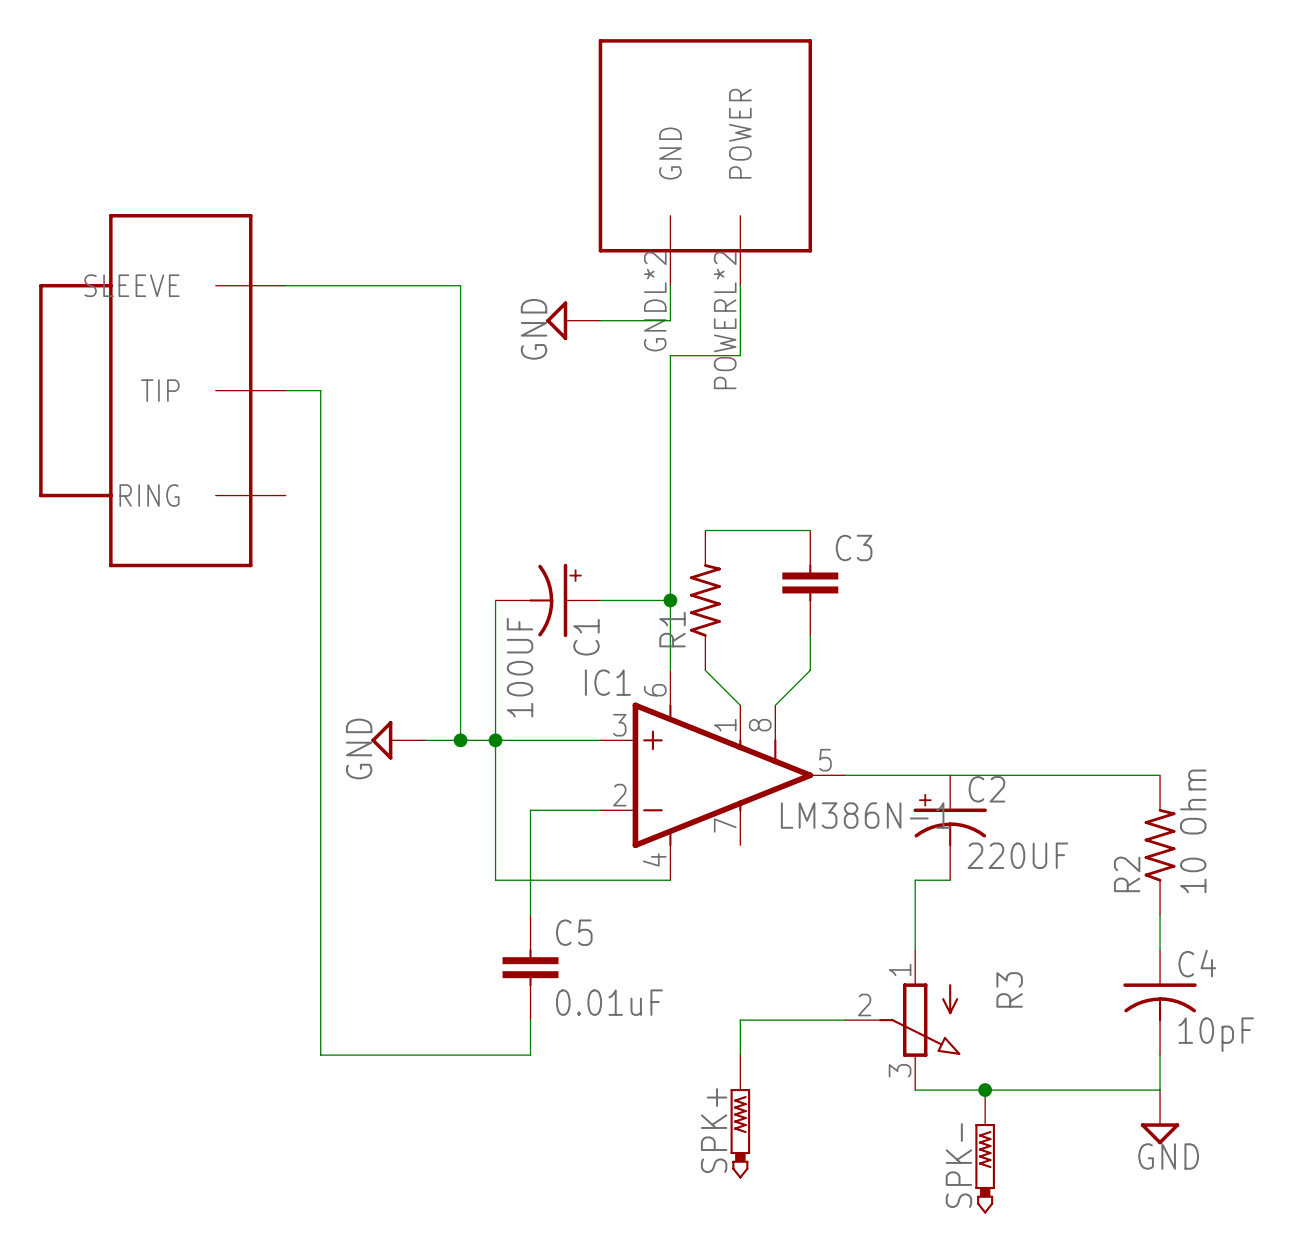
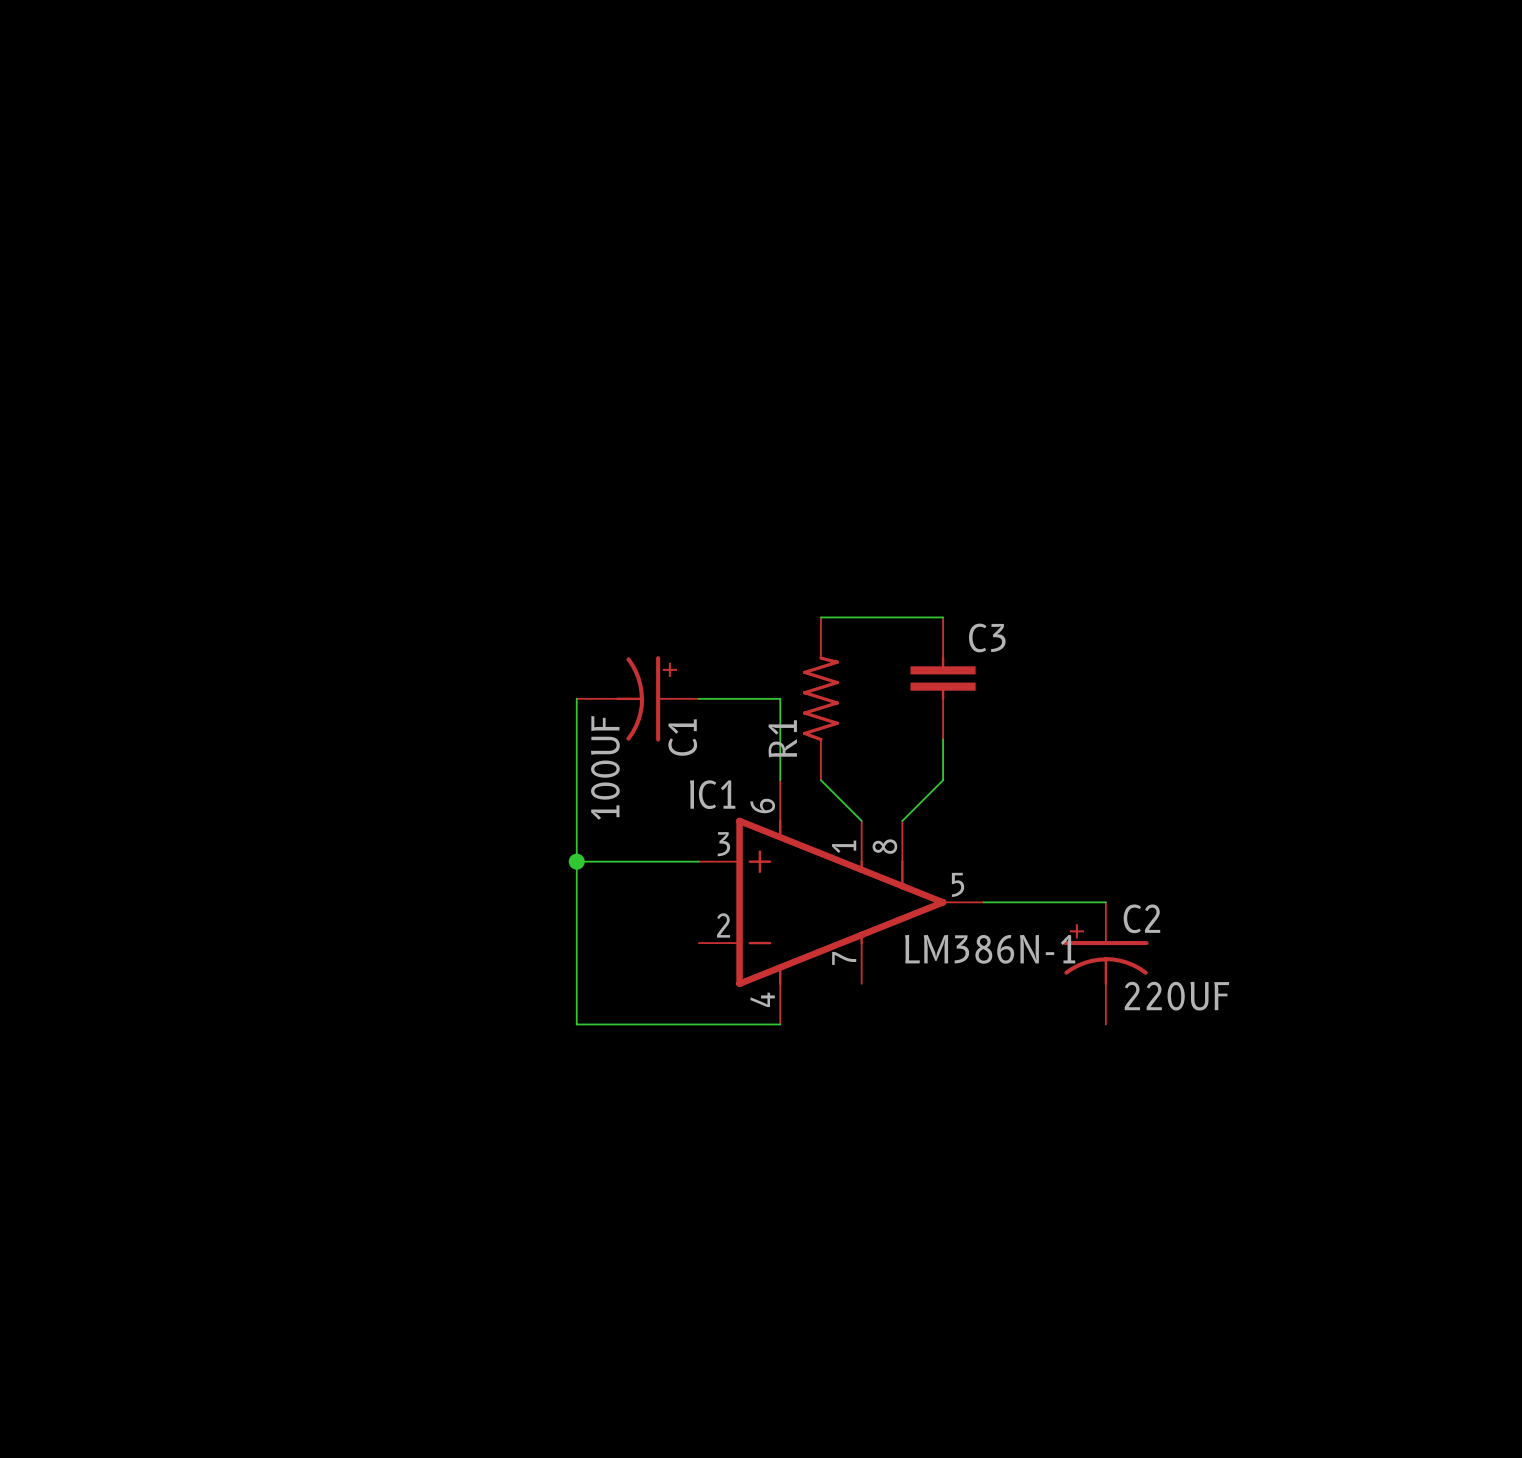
part: (705, 162) -> none
wire: (285, 285) (460, 285) (460, 740) -> none
wire: (670, 285) (670, 320) (600, 320) -> none
wire: (740, 285) (740, 355) (670, 355) (670, 600) -> none
power symbol: GND (573, 320) -> none
part: (162, 390) -> none
wire: (285, 390) (320, 390) (320, 1055) (530, 1055) (530, 1020) -> none
junction: (670, 600) -> none
power symbol: GND (398, 740) -> none
wire: (425, 740) (495, 740) -> none
junction: (460, 740) -> none
wire: (950, 775) (1160, 775) -> none
wire: (600, 810) (530, 810) (530, 915) -> none
R2: 10 Ohm (1160, 845) -> none
wire: (950, 880) (915, 880) (915, 950) -> none
wire: (1160, 915) (1160, 950) -> none
C5: 0.01uF (530, 967) -> none
C4: 10pF (1160, 1002) -> none
wire: (845, 1020) (740, 1020) (740, 1055) -> none
R3: (902, 1020) -> none
wire: (1160, 1055) (1160, 1090) (915, 1090) -> none
junction: (985, 1090) -> none
SPK+: (740, 1116) -> none
power symbol: GND (1160, 1117) -> none
SPK-: (985, 1151) -> none

